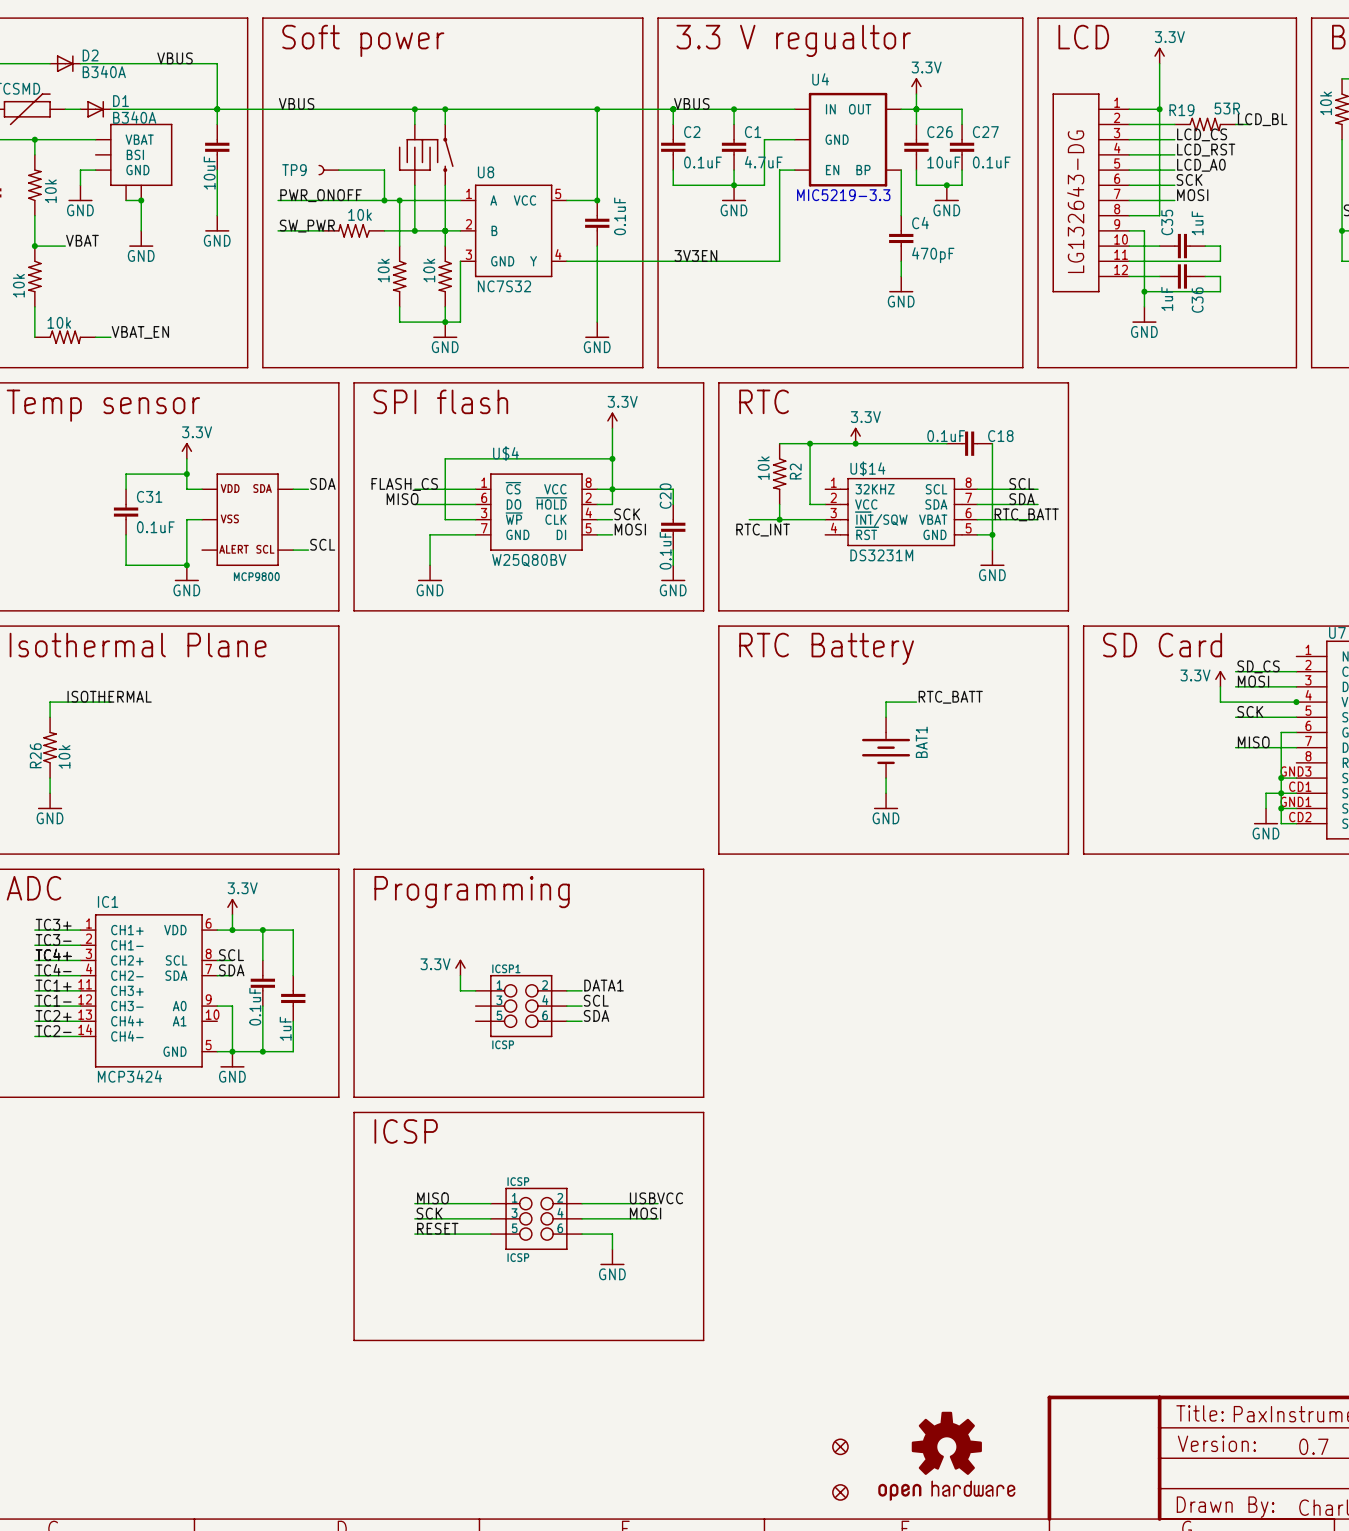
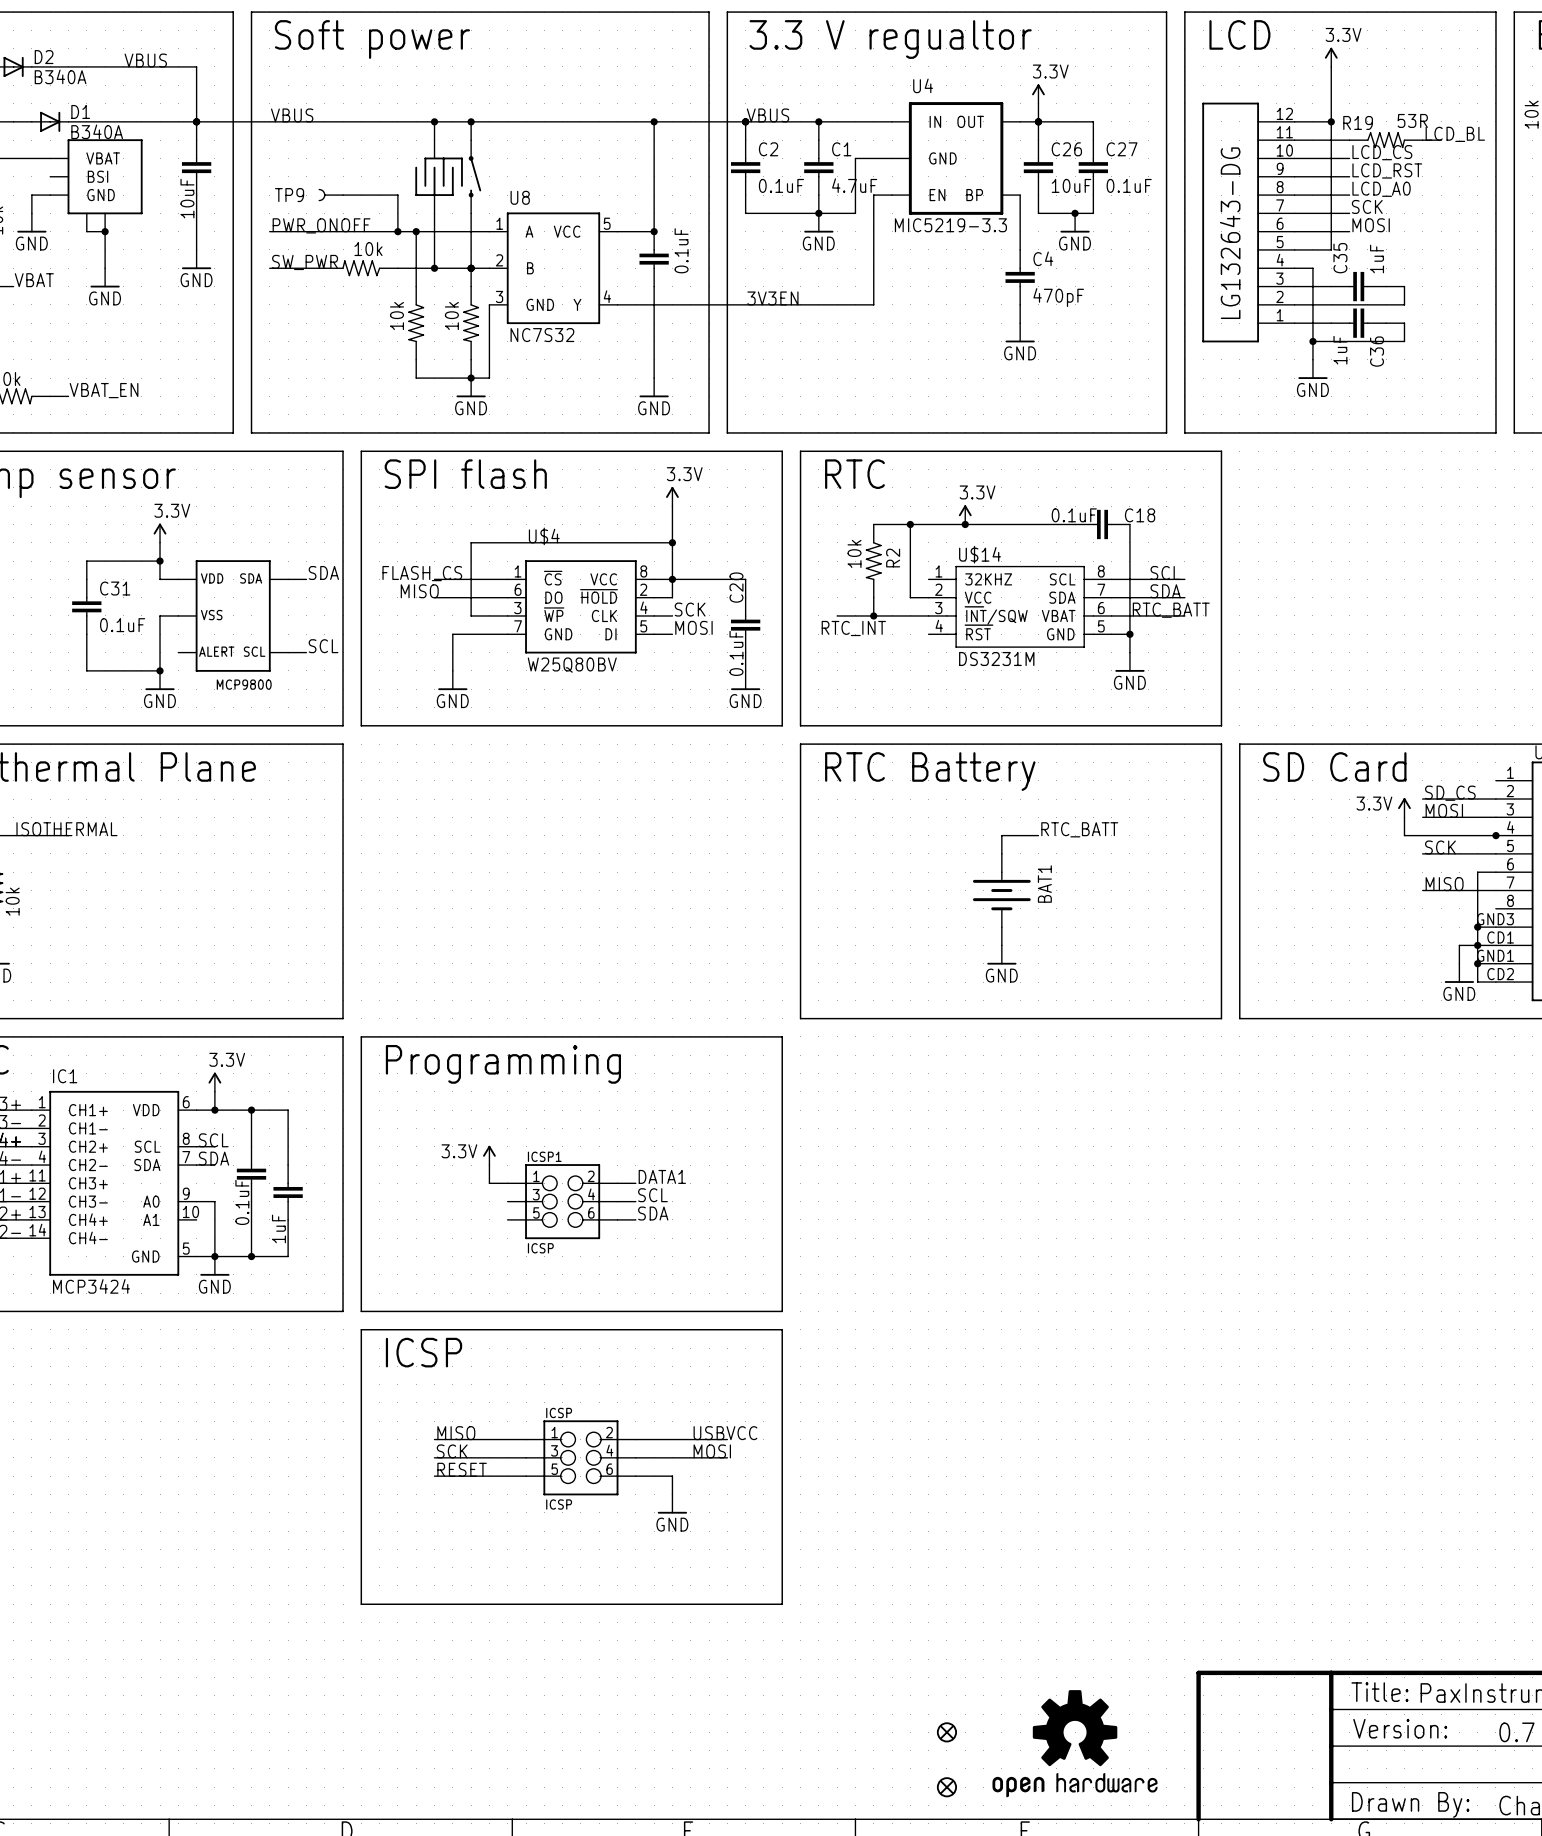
part flip: as is (1114, 192) -> up-down (1276, 222)

